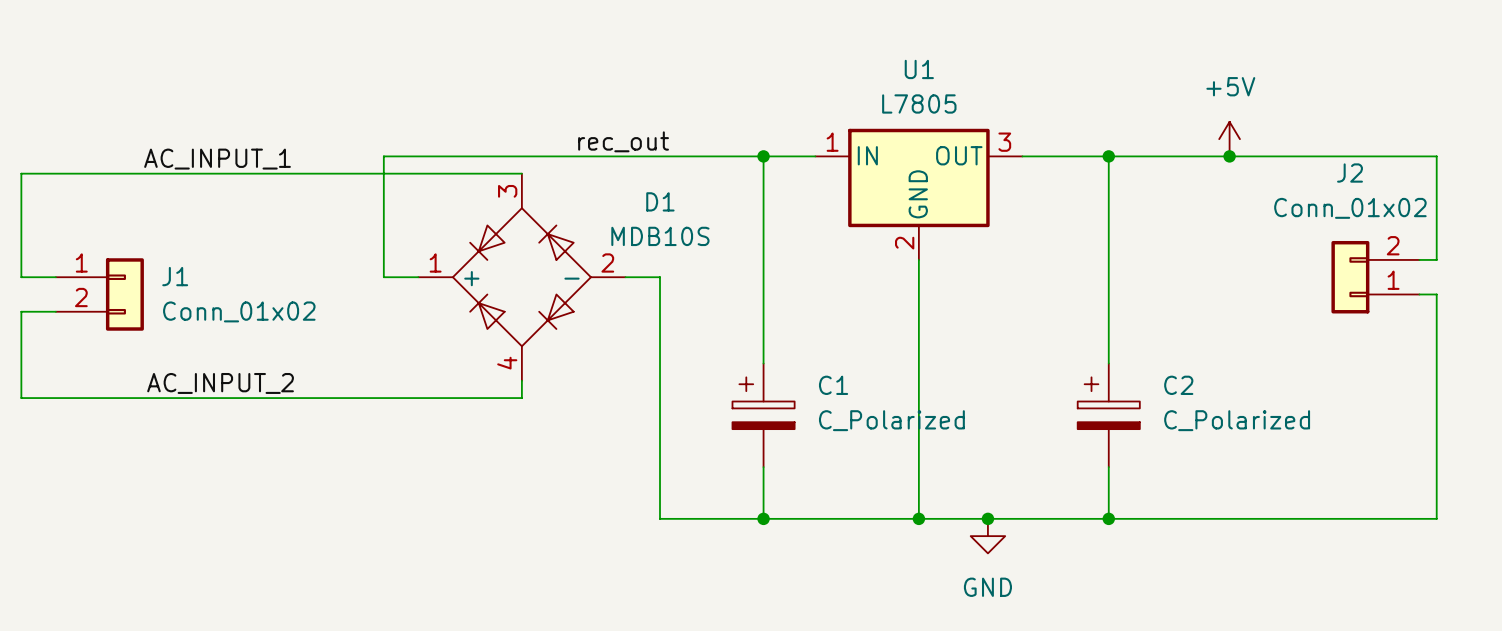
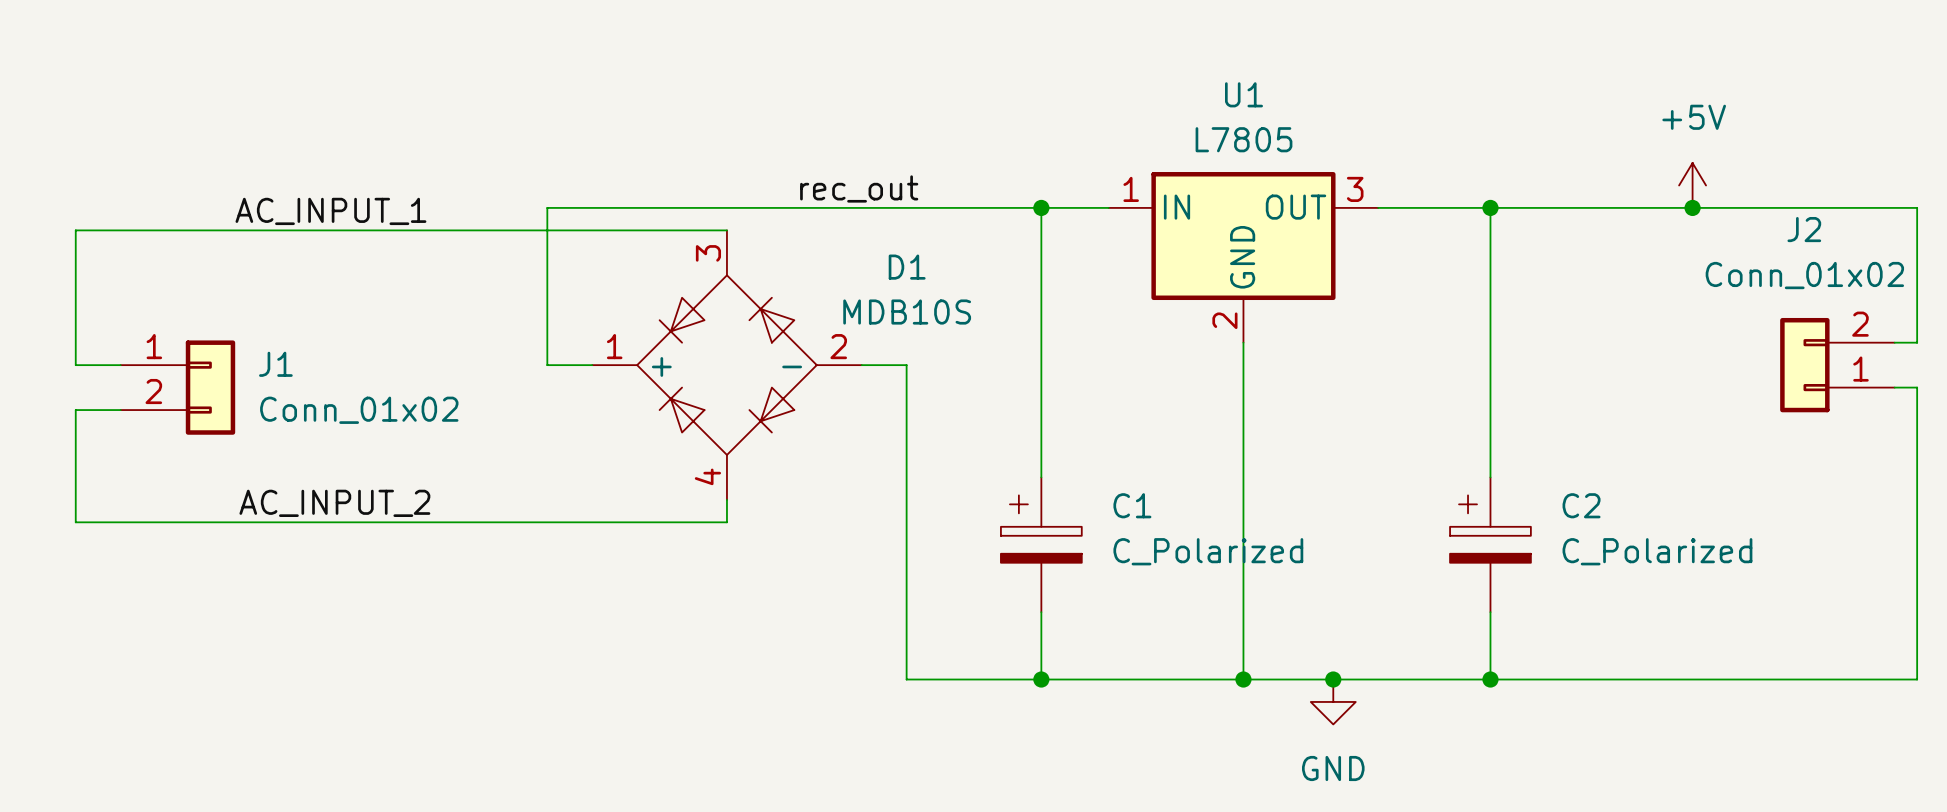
power symbol position: +5V (1229, 139) -> +5V (1692, 185)
junction position: (1229, 156) -> (1692, 207)

